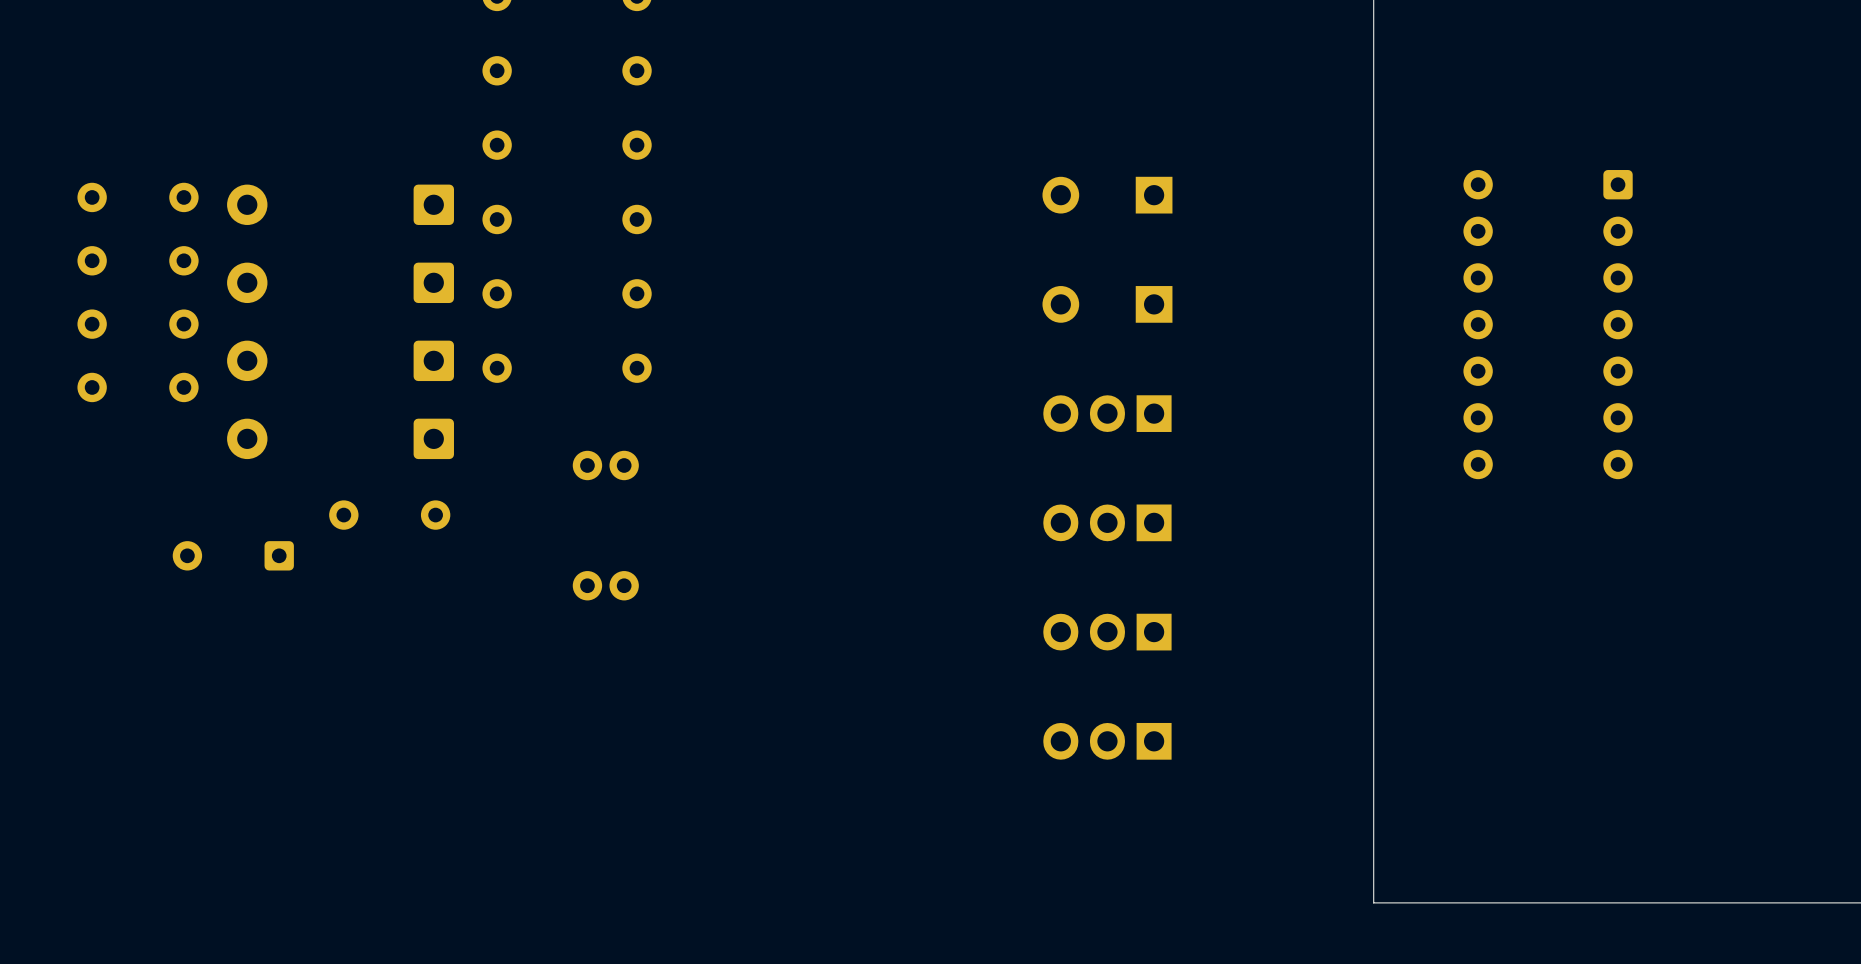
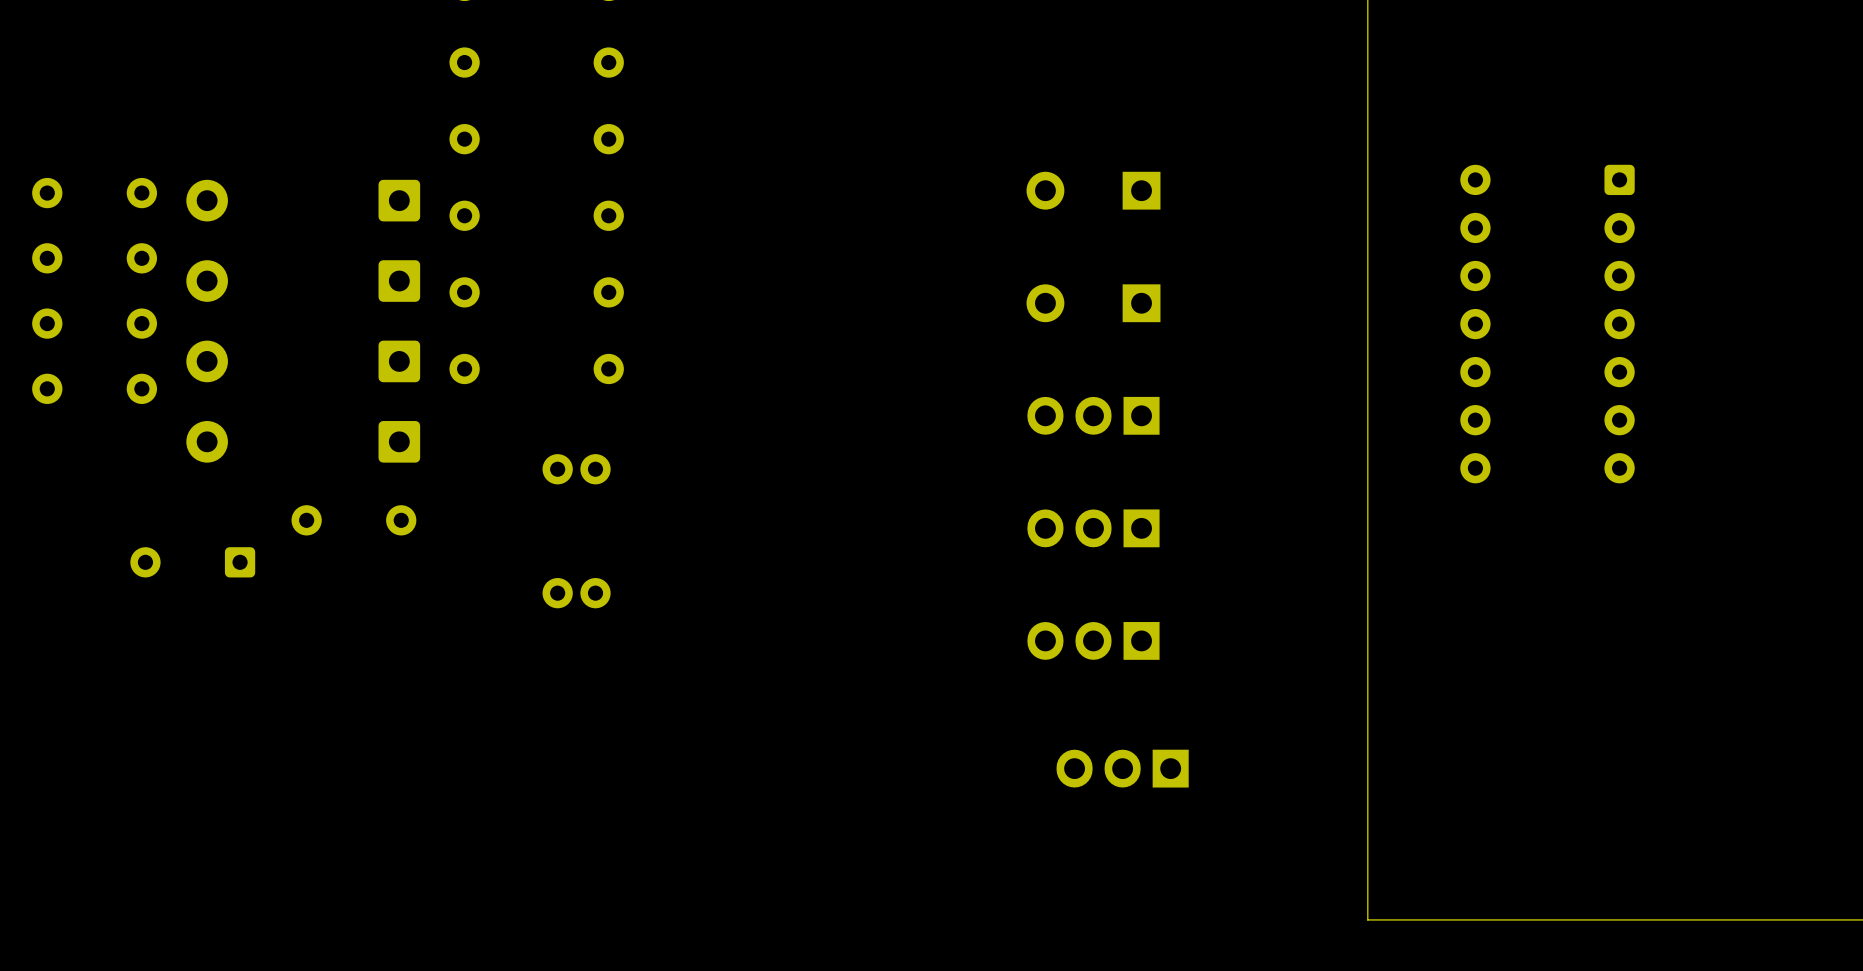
part position: (1107, 741) -> (1122, 768)

